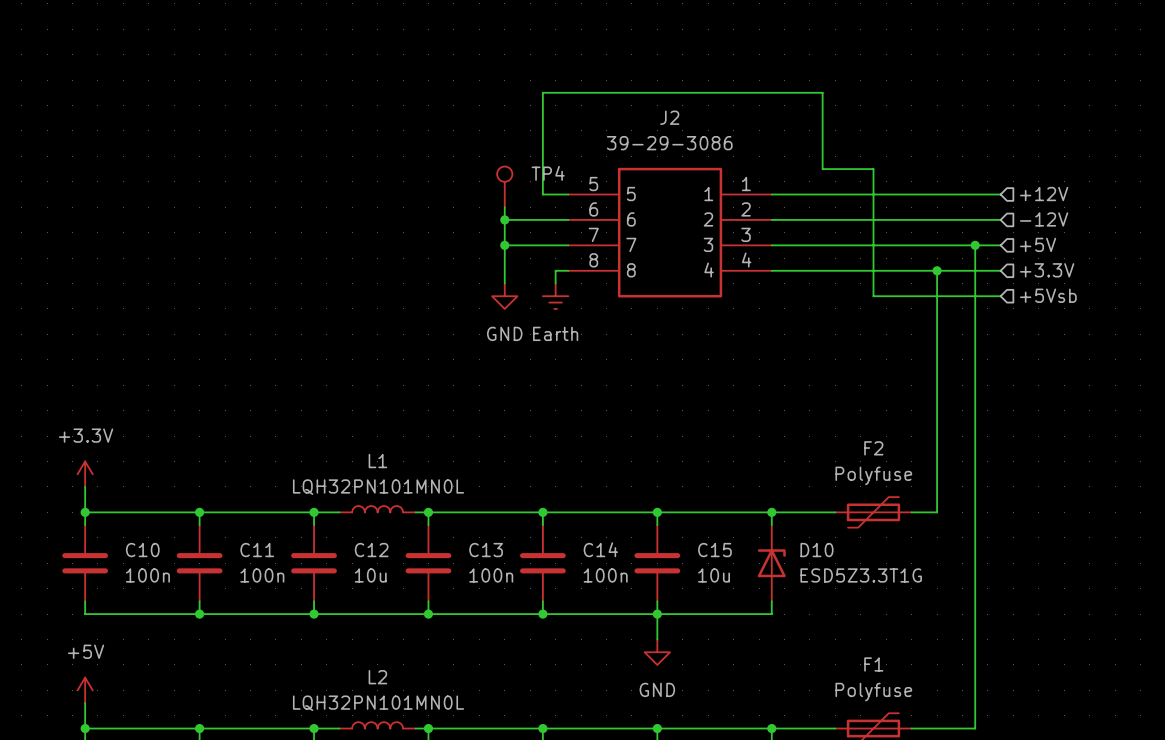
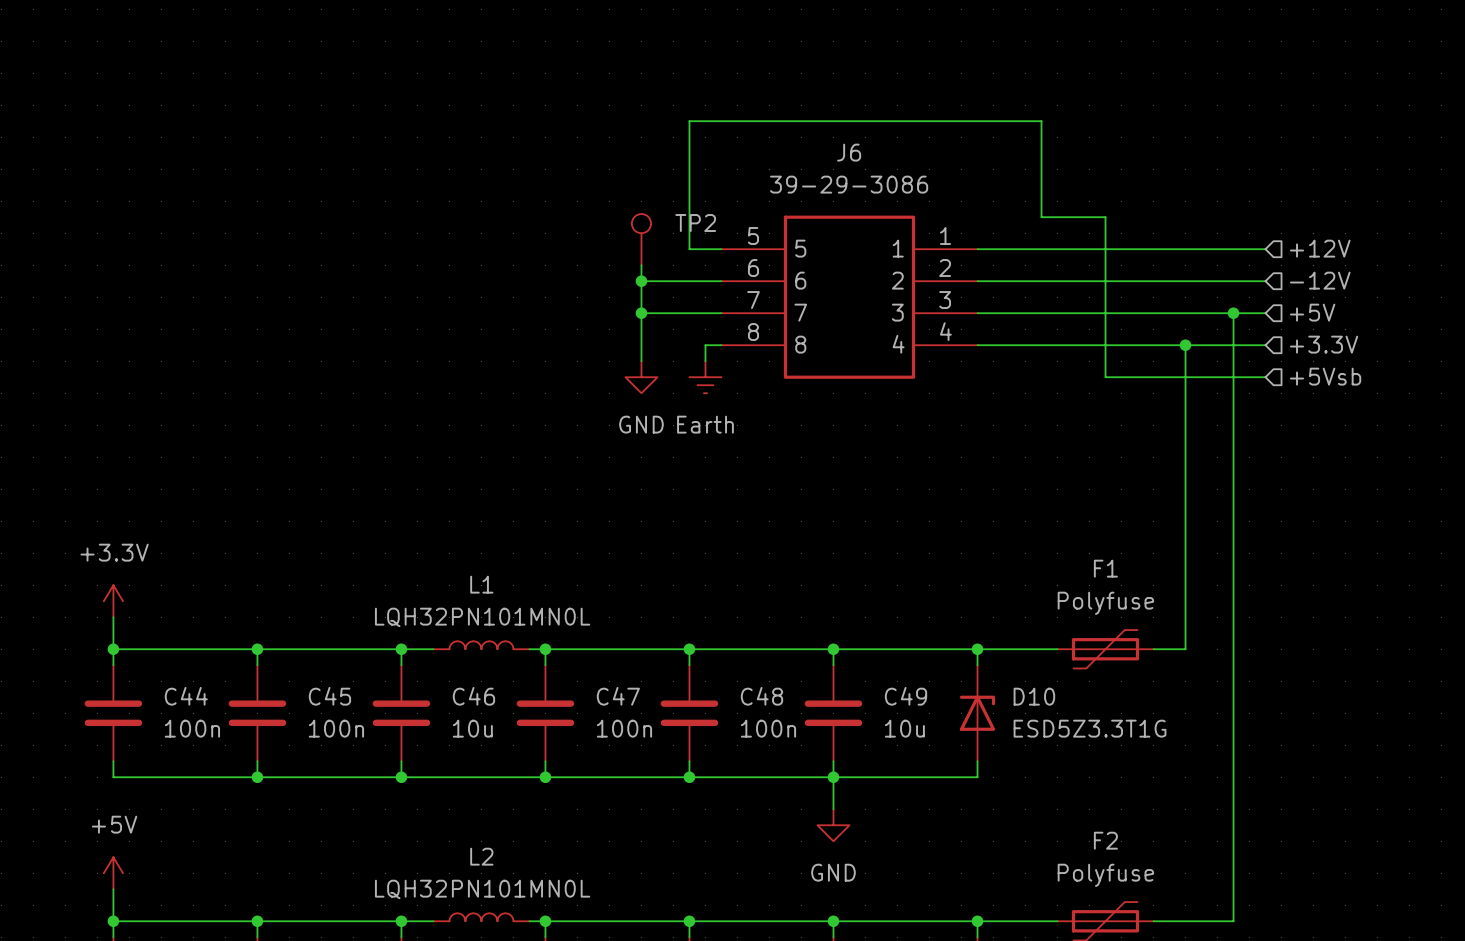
J2 name: J2 (669, 117) -> J6 (849, 152)
TP4 name: TP4 (548, 173) -> TP2 (695, 223)
F2 name: F2 (873, 448) -> F1 (1105, 568)
C14 name: C14 (600, 549) -> C48 (761, 696)
C10 name: C10 (142, 550) -> C44 (186, 696)
C11 name: C11 (257, 550) -> C45 (329, 696)
C12 name: C12 (371, 550) -> C46 (473, 696)
C13 name: C13 (486, 550) -> C47 (618, 696)
C15 name: C15 (714, 550) -> C49 (905, 696)
F1 name: F1 (873, 664) -> F2 (1105, 840)

